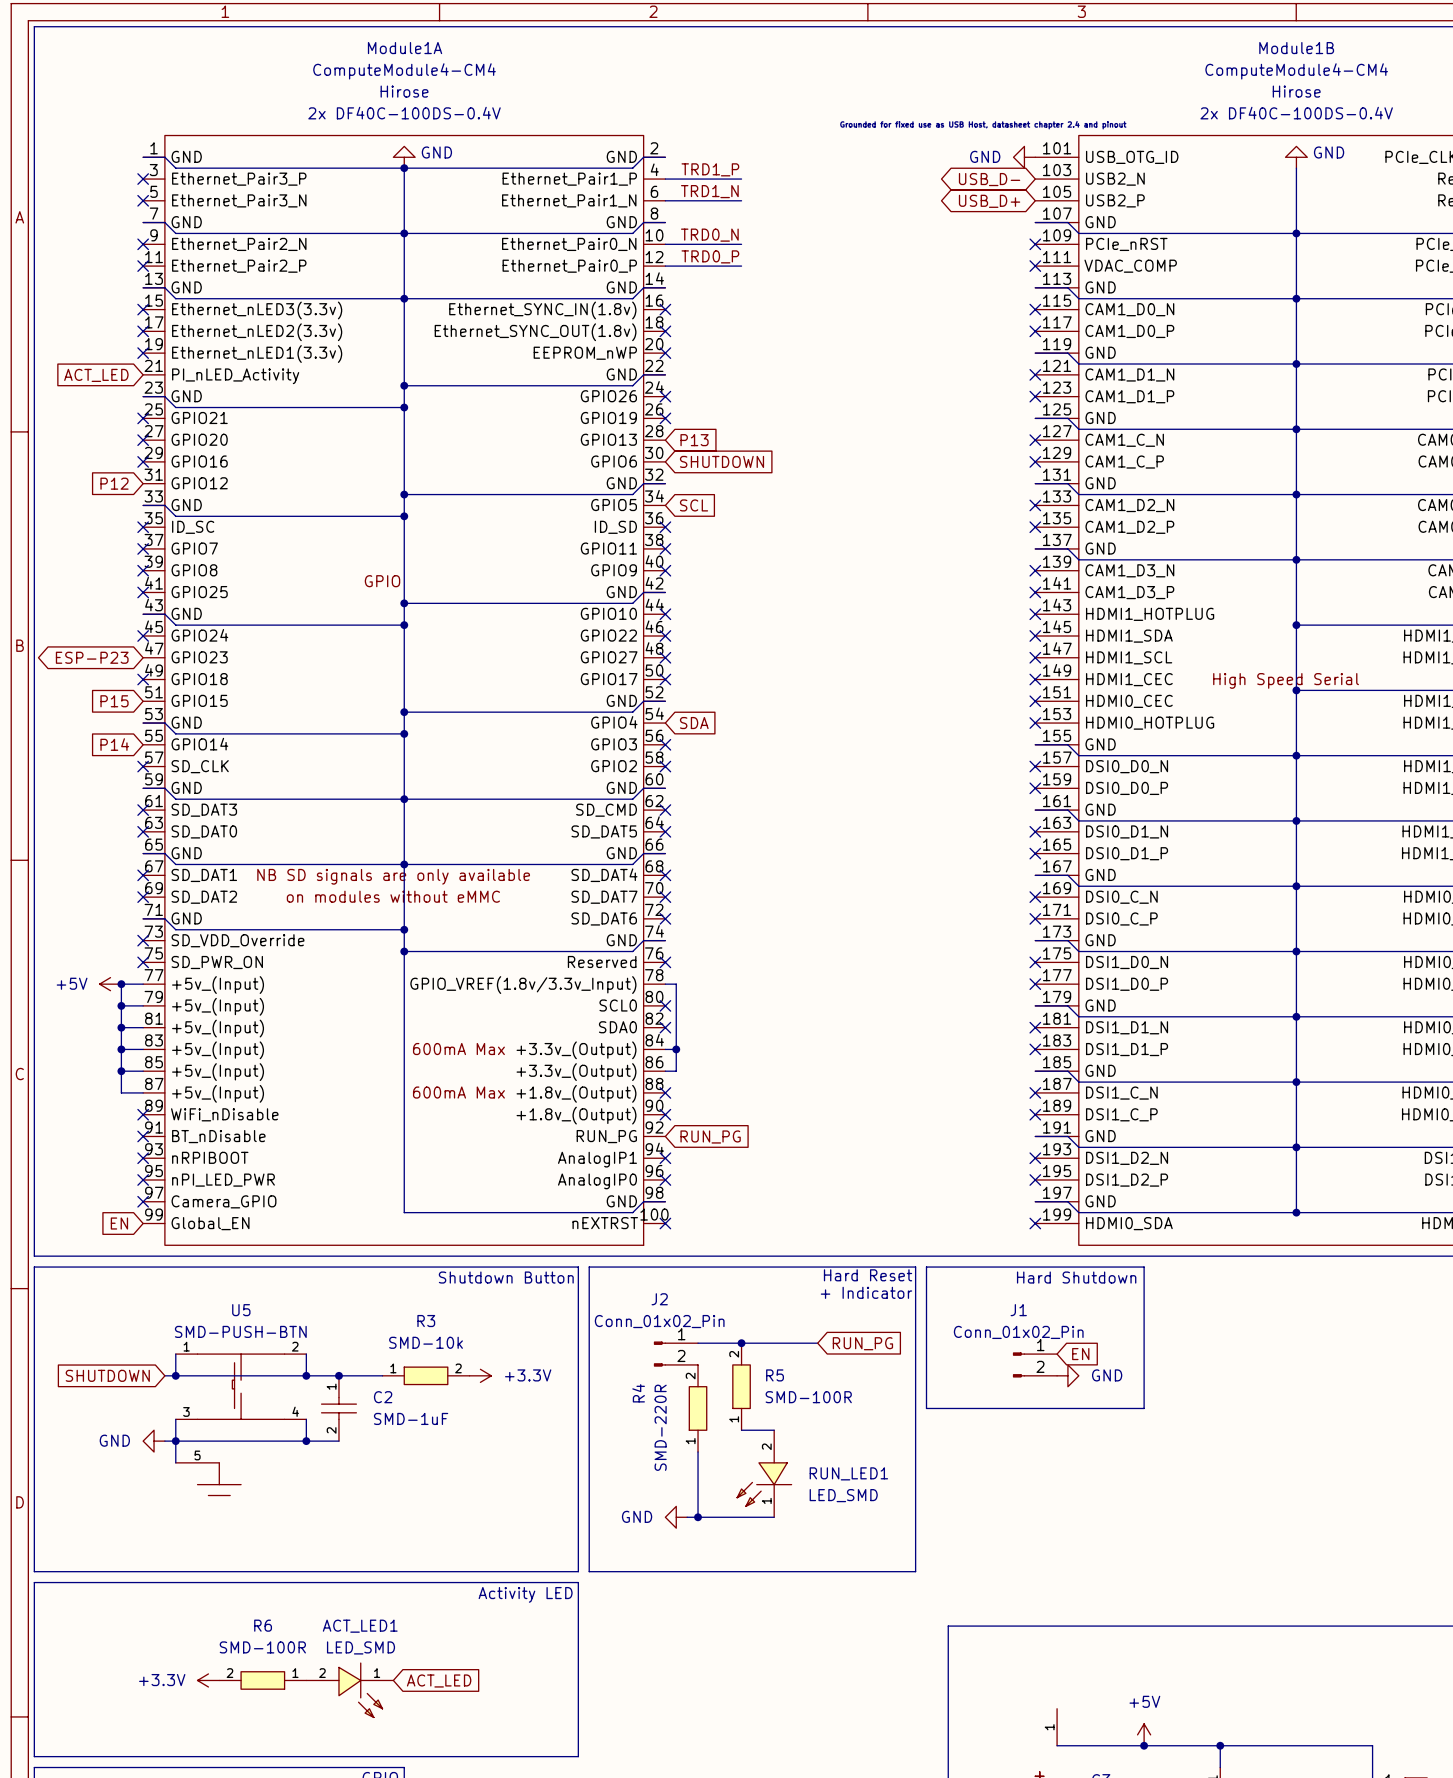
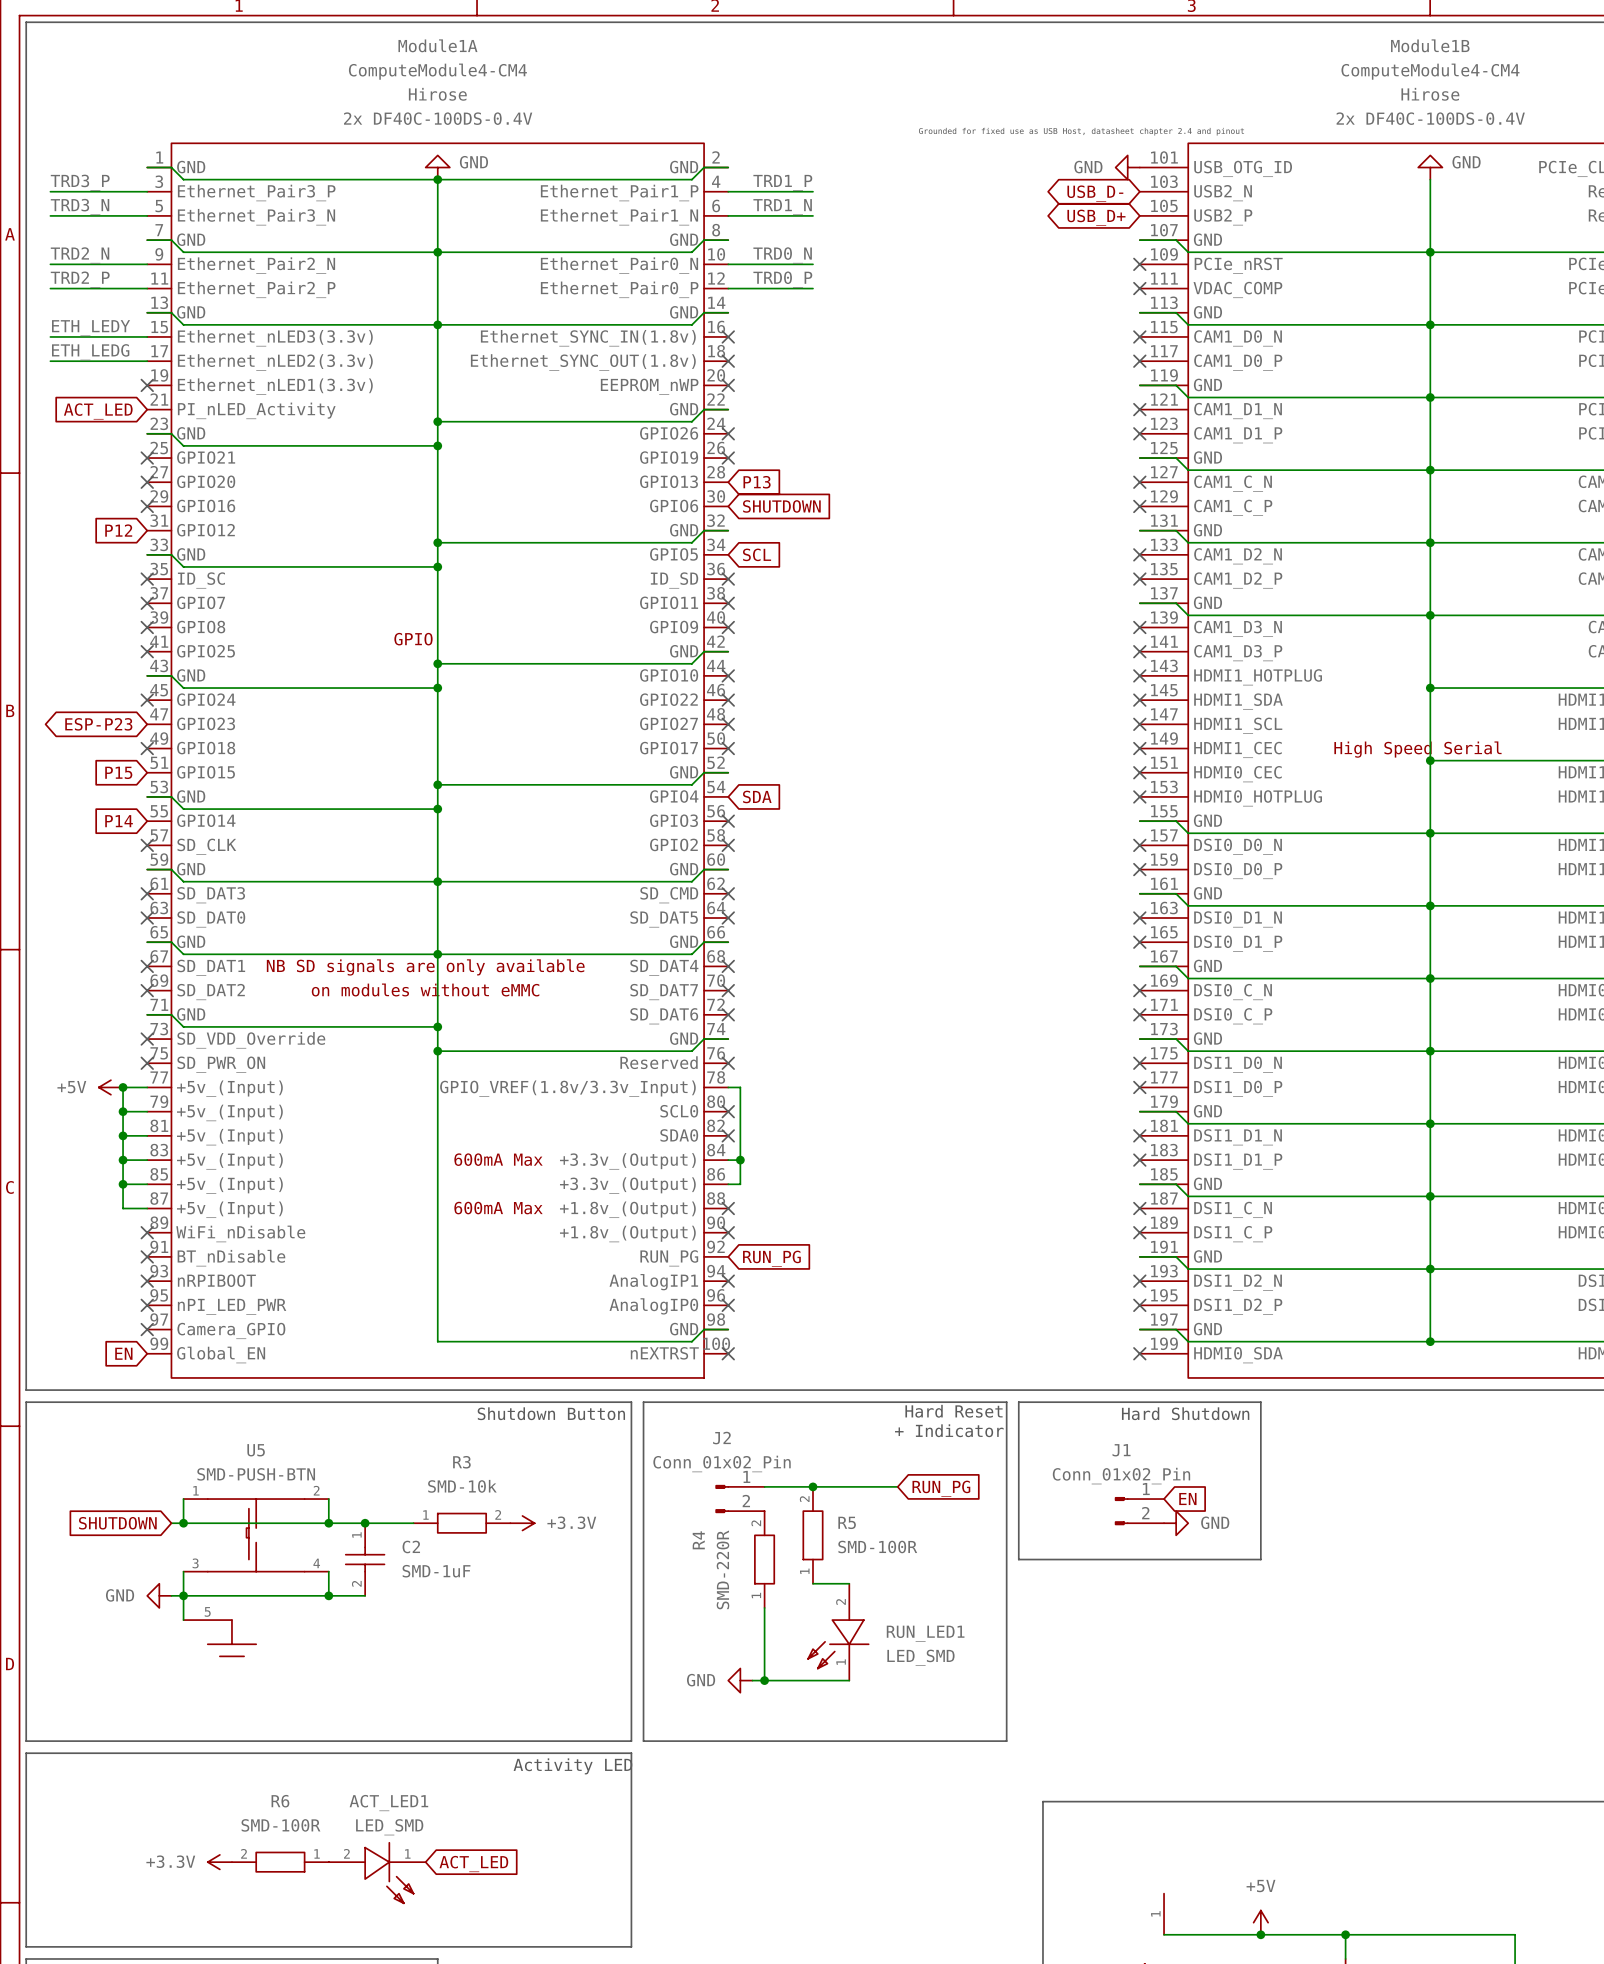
label: none -> TRD3_P (80, 182)
wire: none -> (50, 191) (147, 191)
no-connect mark: (143, 179) -> none
label: none -> TRD3_N (80, 206)
wire: none -> (50, 215) (147, 215)
no-connect mark: (143, 200) -> none
label: none -> TRD2_N (80, 255)
wire: none -> (50, 264) (147, 264)
no-connect mark: (143, 244) -> none
label: none -> TRD2_P (80, 279)
wire: none -> (50, 288) (147, 288)
no-connect mark: (143, 266) -> none
label: none -> ETH_LEDY (91, 328)
wire: none -> (50, 336) (147, 336)
no-connect mark: (143, 309) -> none
label: none -> ETH_LEDG (90, 352)
wire: none -> (50, 361) (147, 361)
no-connect mark: (143, 331) -> none

